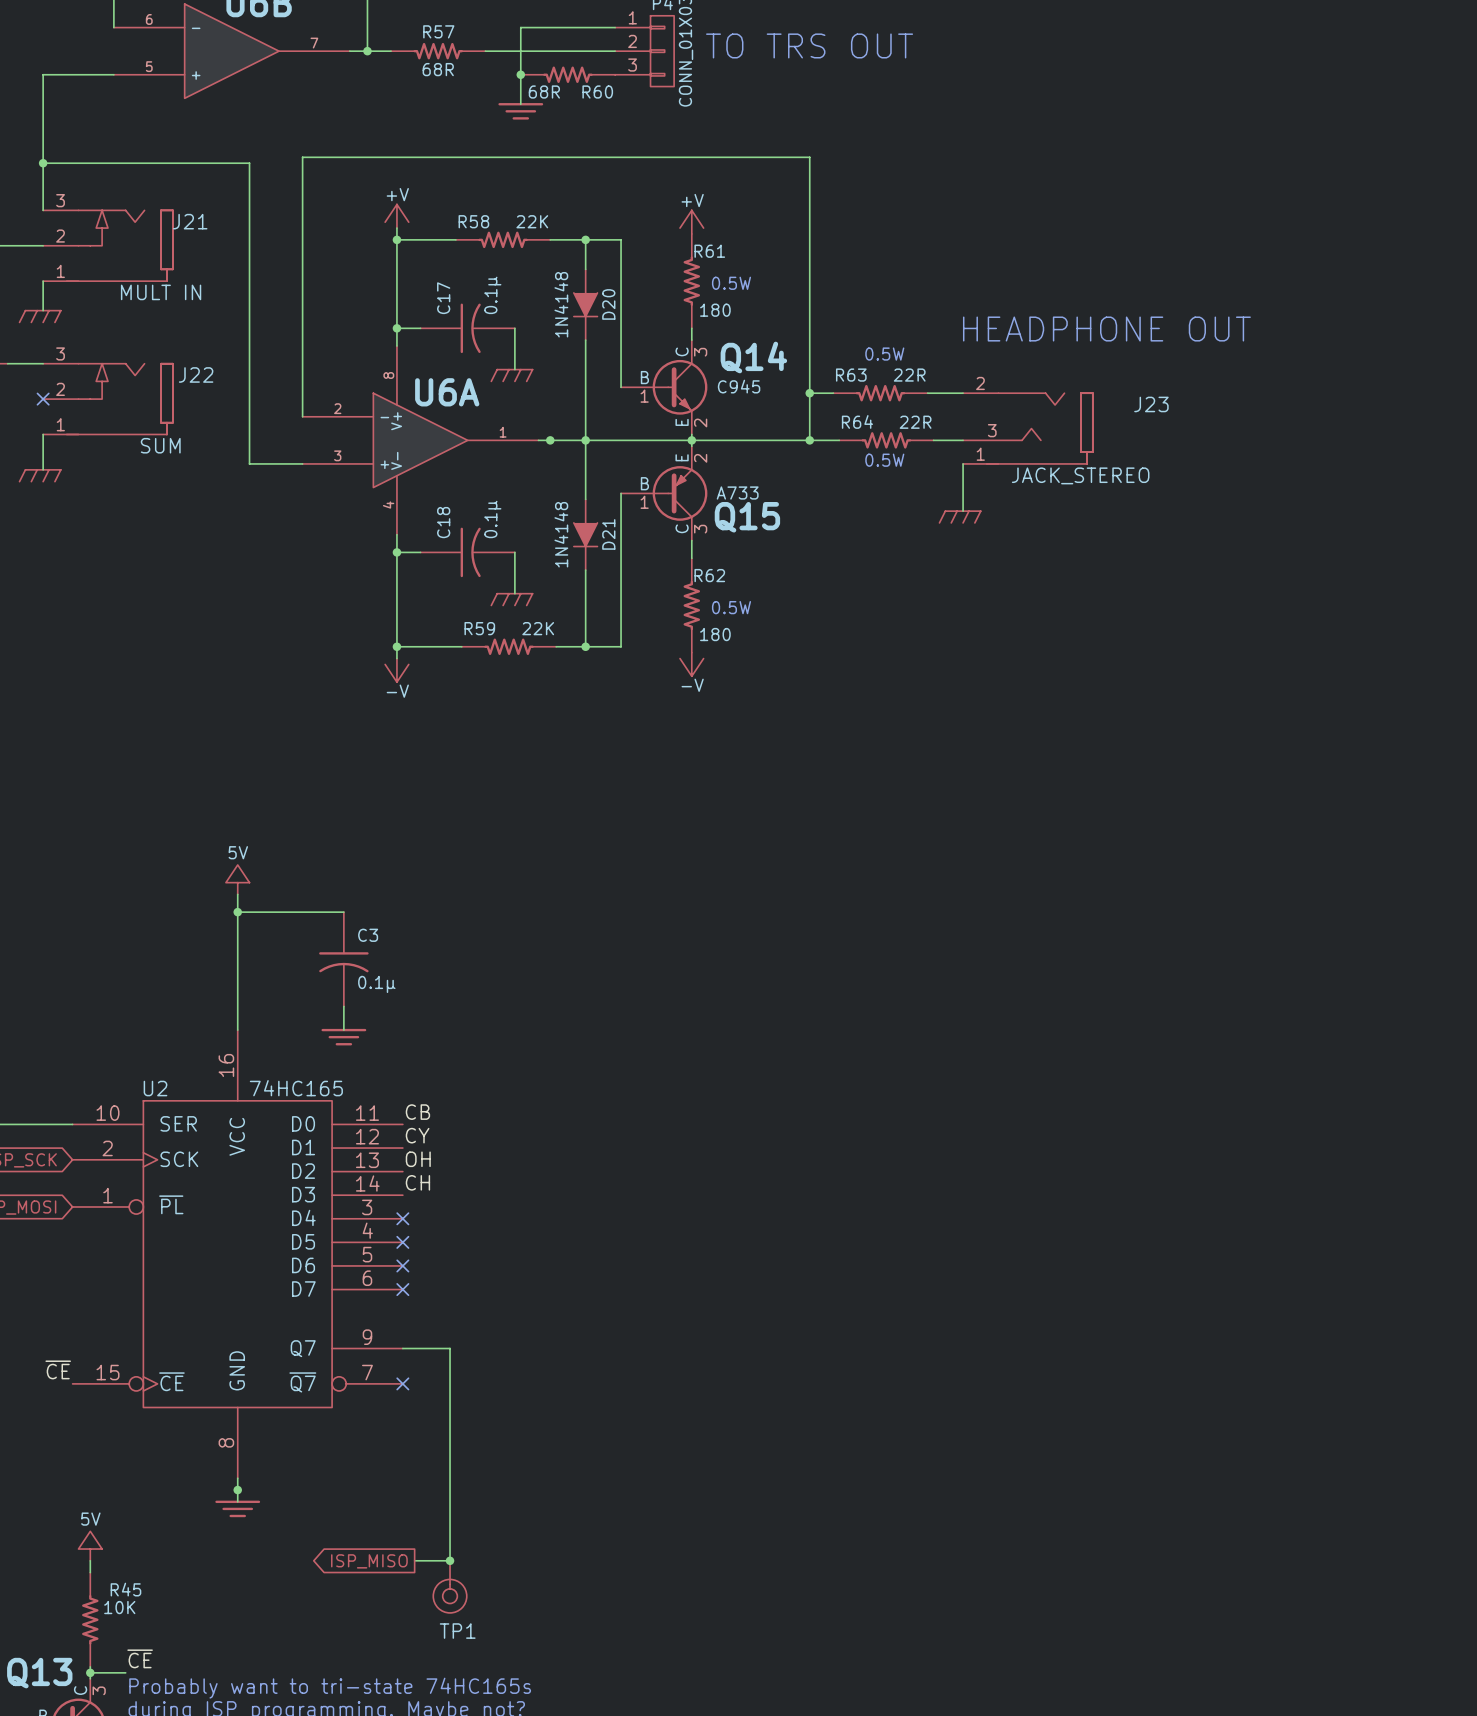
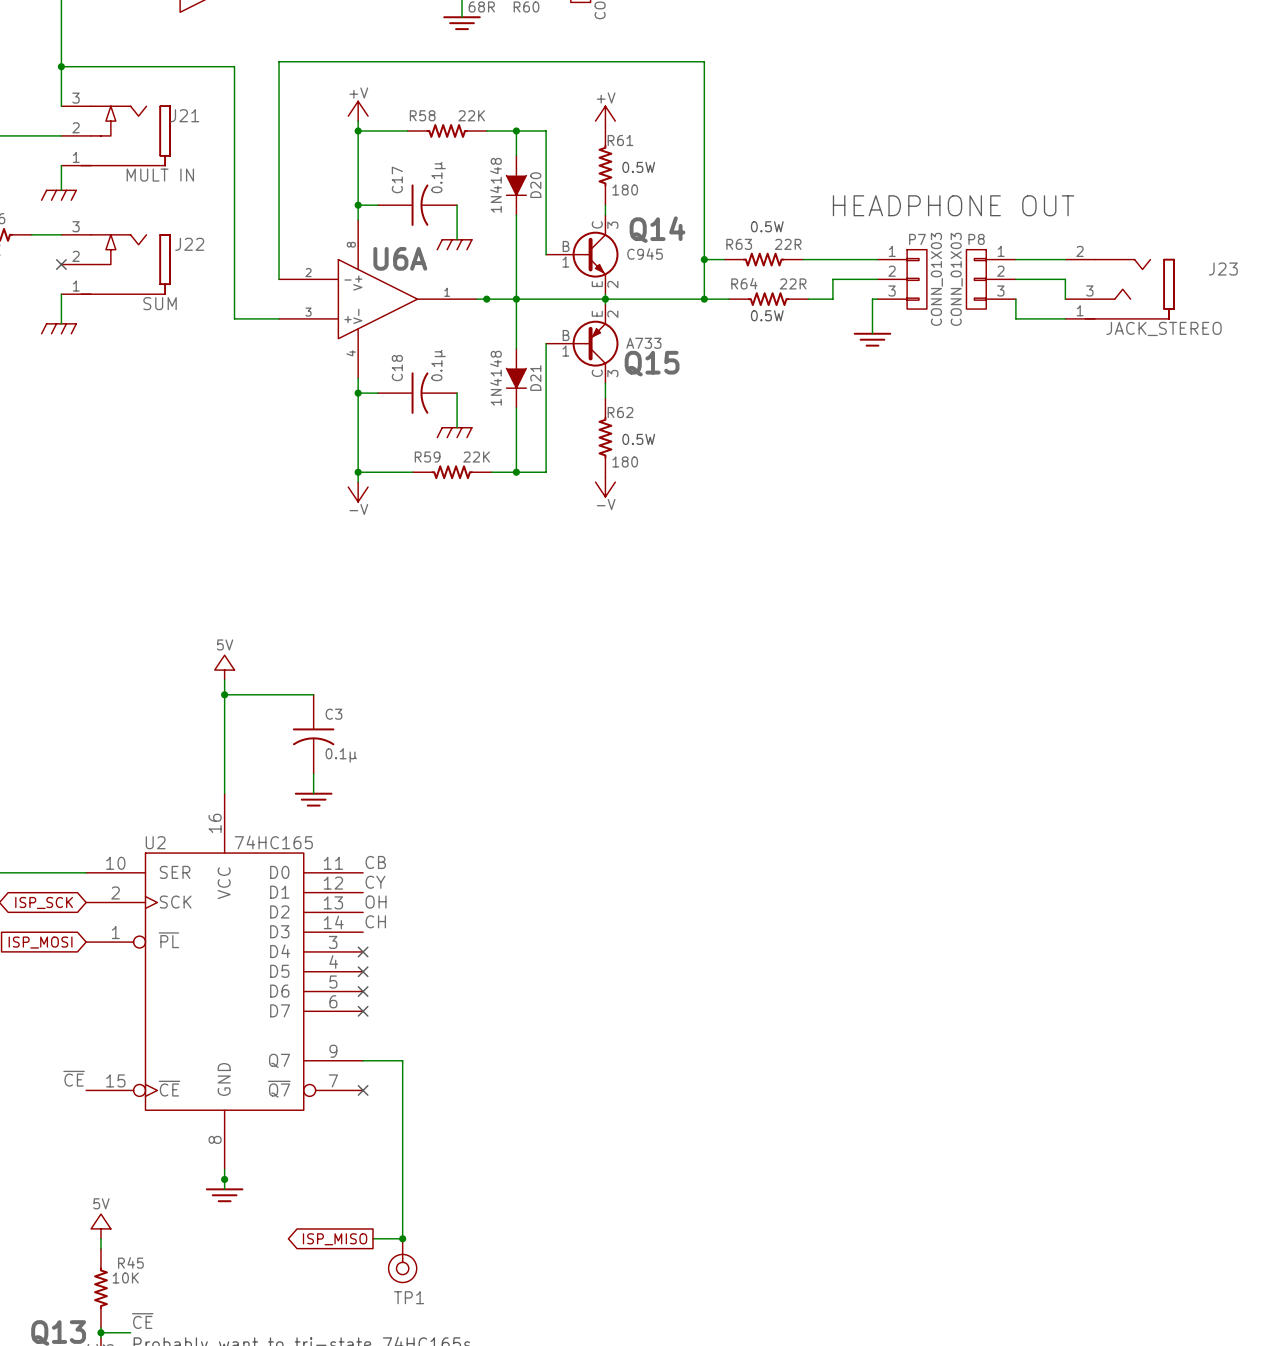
wire: none -> (1015, 259) (1065, 259)
wire: none -> (877, 279) (832, 279) (832, 299)
P7: none -> CONN_01X03 (902, 279)
P8: none -> CONN_01X03 (991, 279)
wire: none -> (1015, 279) (1065, 279) (1065, 299)
J23 position: (1027, 428) -> (1119, 289)
wire: none -> (877, 299) (872, 299) (872, 333)
wire: none -> (1015, 299) (1015, 318) (1065, 318)
wire: (963, 463) (963, 511) -> none
power symbol: none -> (872, 339)
power symbol: (960, 517) -> none

